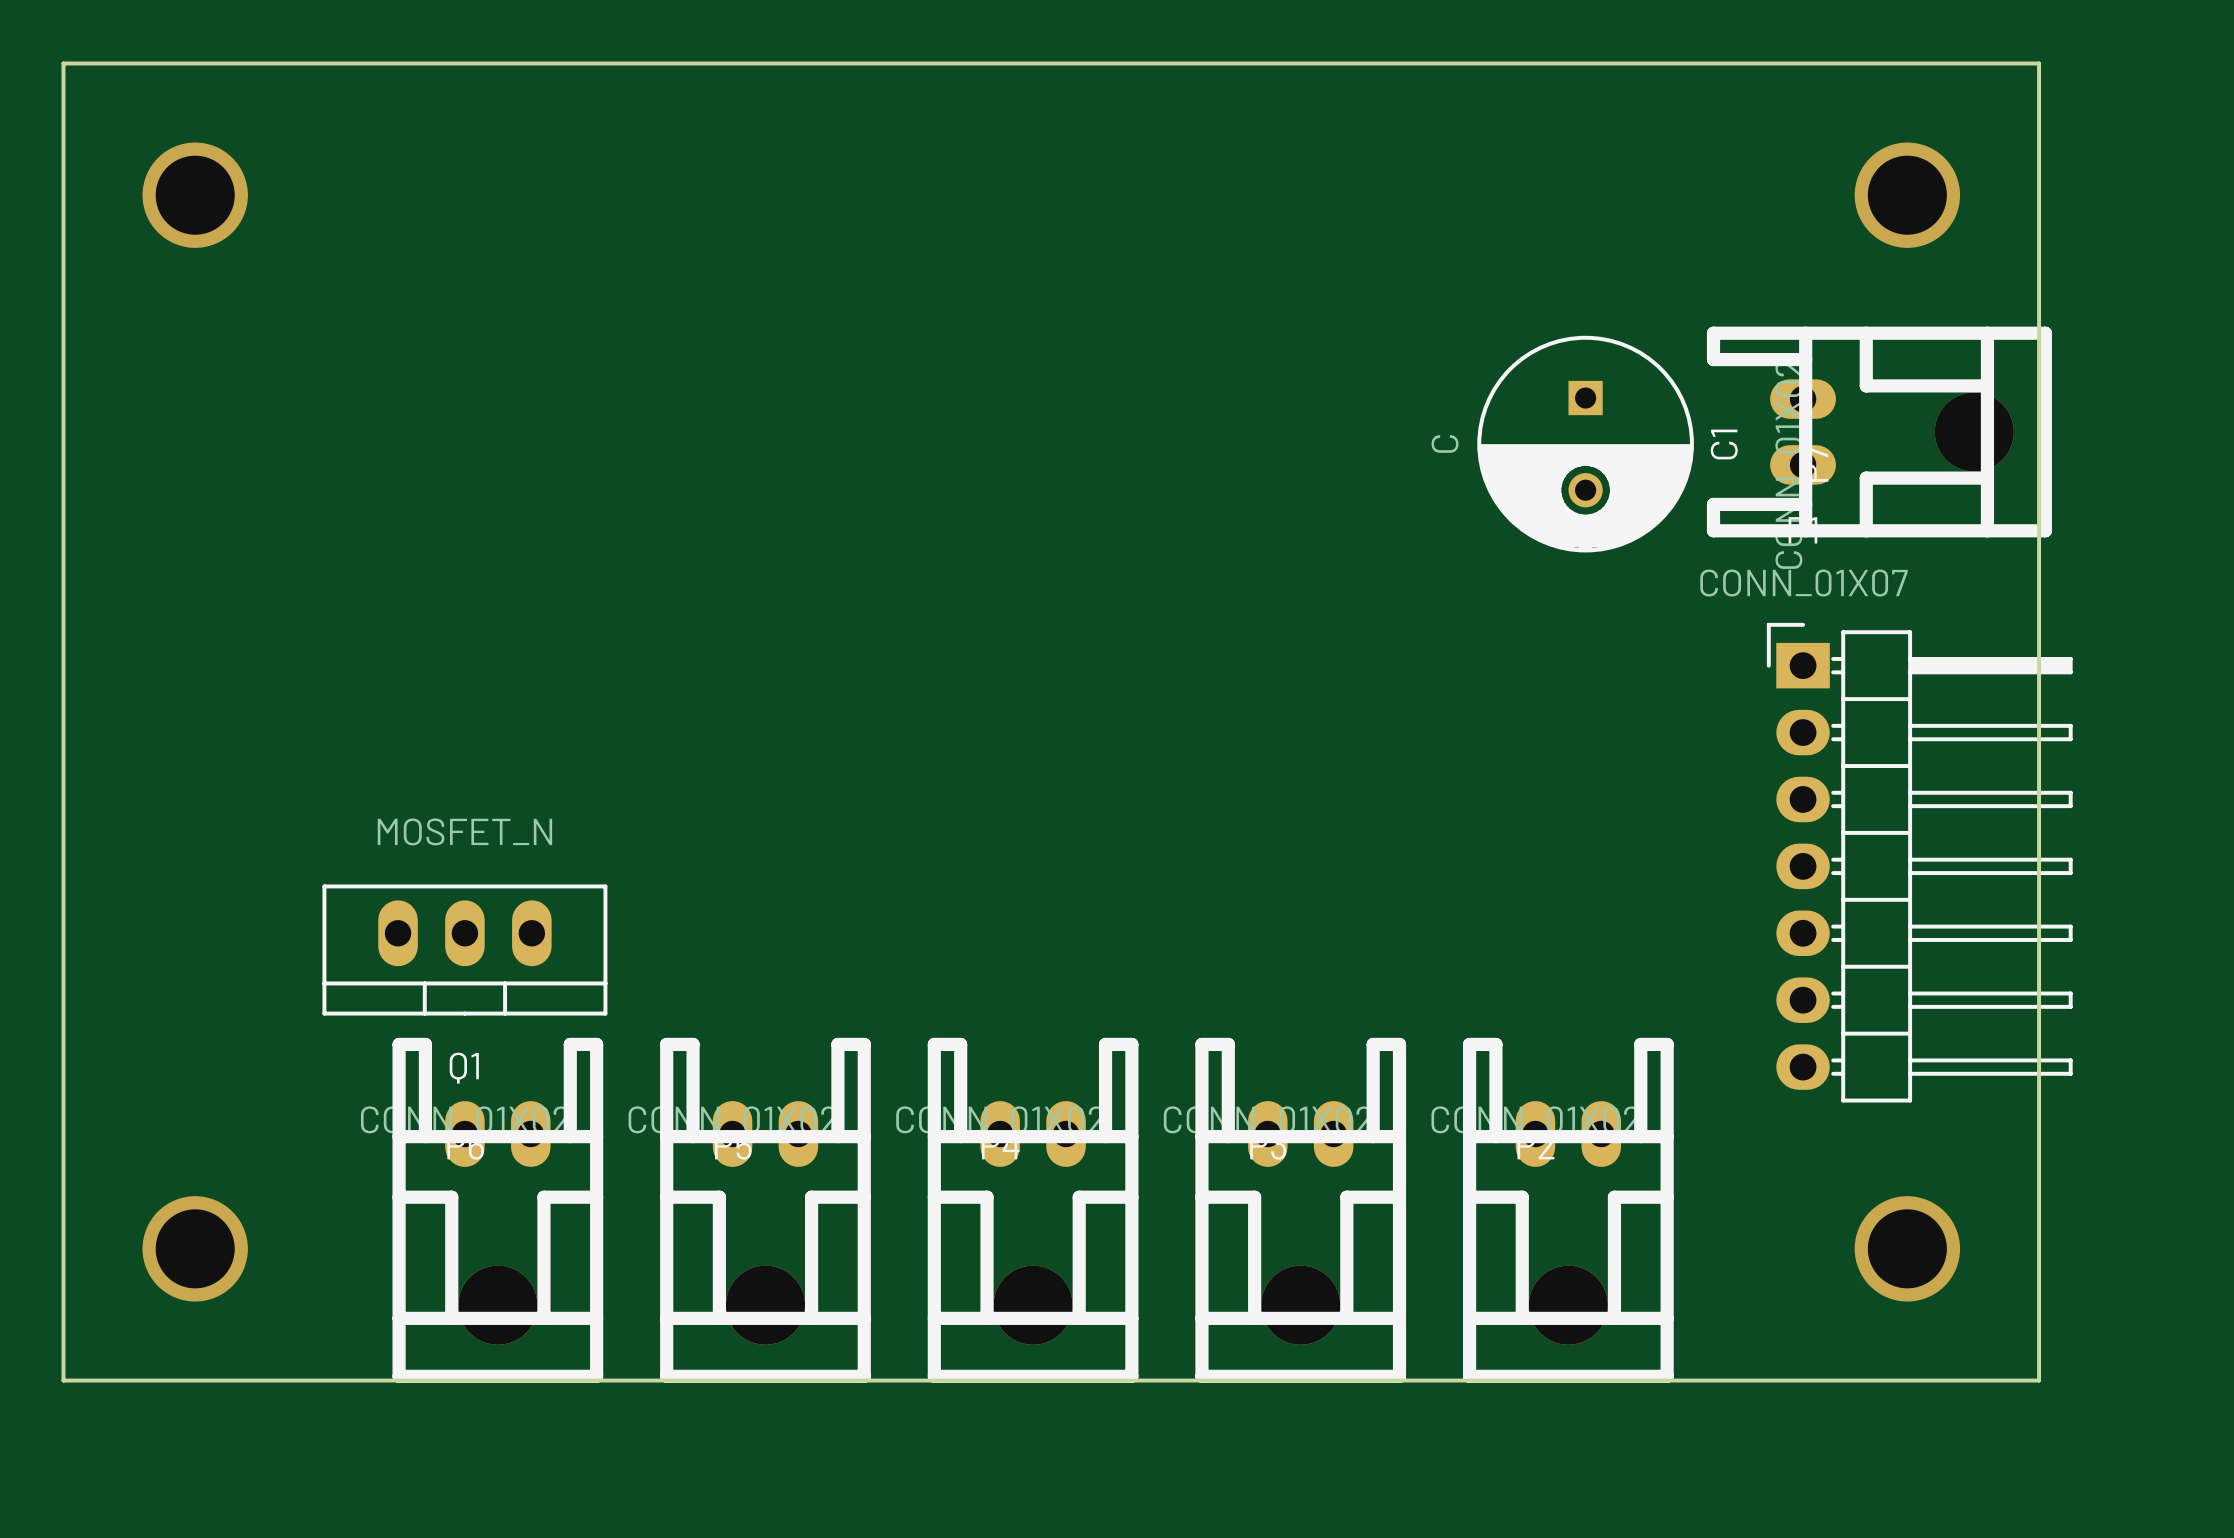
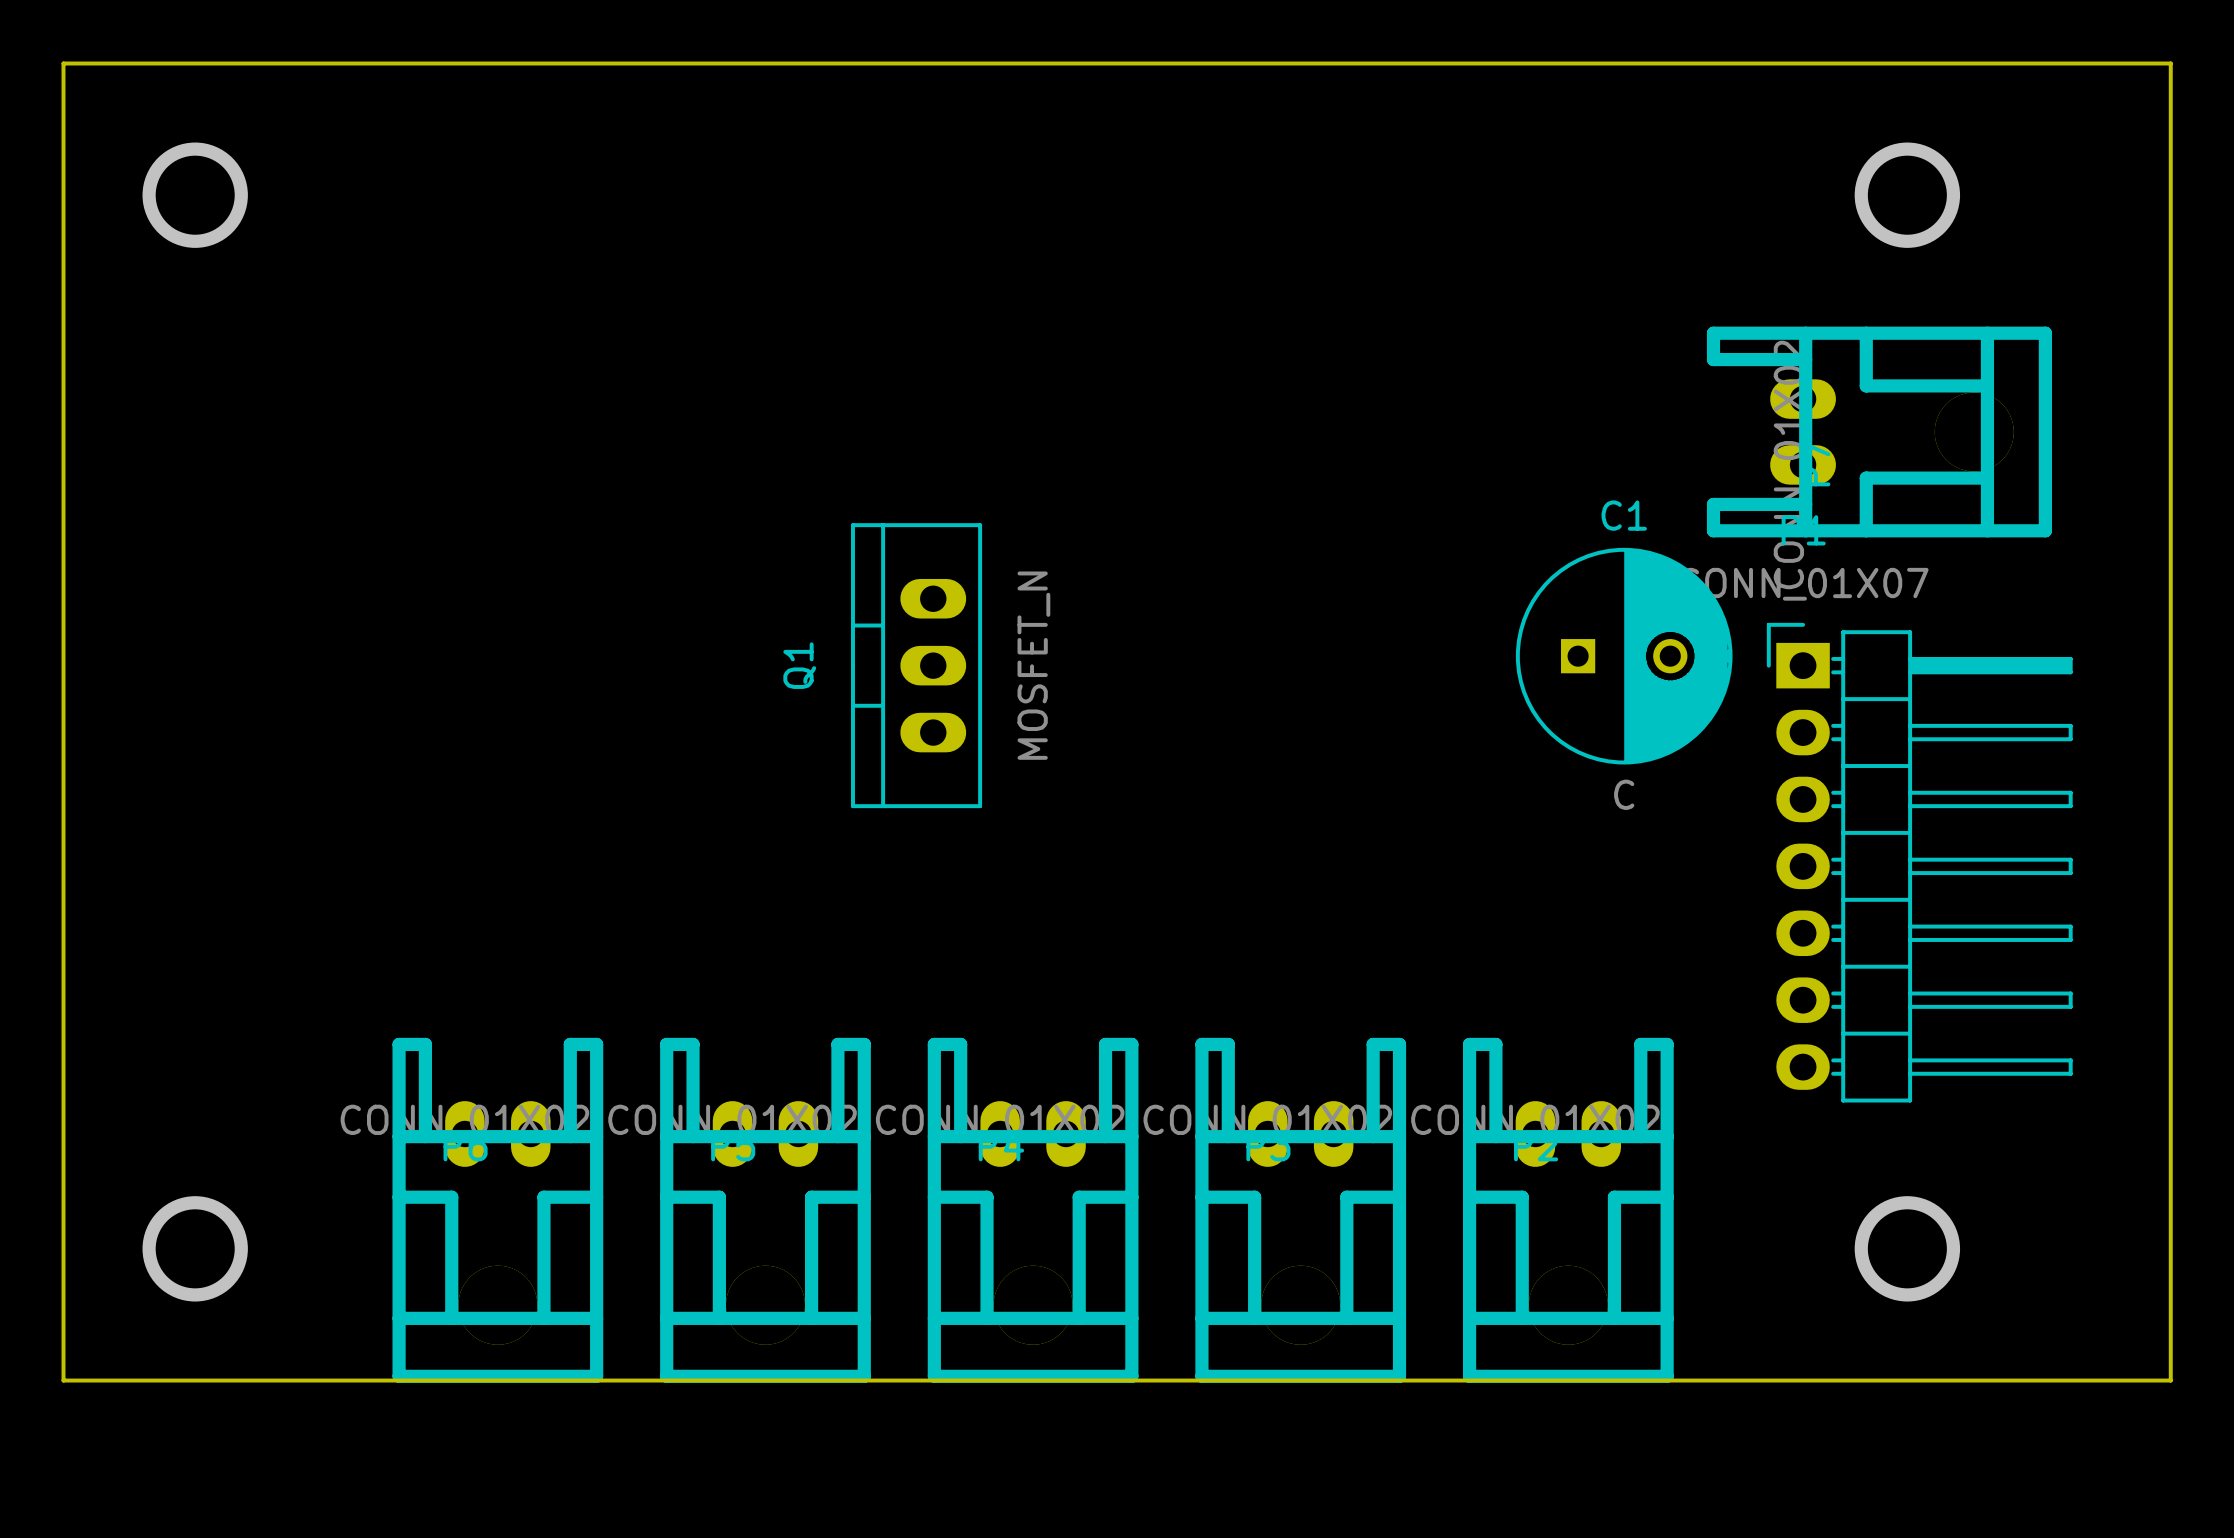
board edge: (2039, 63) (2039, 1380) -> (2039, 63) (2170, 63) (2170, 1380) (2039, 1380)
C1 rotation: 0° (1585, 444) -> 90° counterclockwise (1624, 656)
C1 position: (1585, 444) -> (1624, 656)
Q1 rotation: 0° (464, 950) -> 90° clockwise (916, 665)
Q1 position: (464, 950) -> (916, 665)

